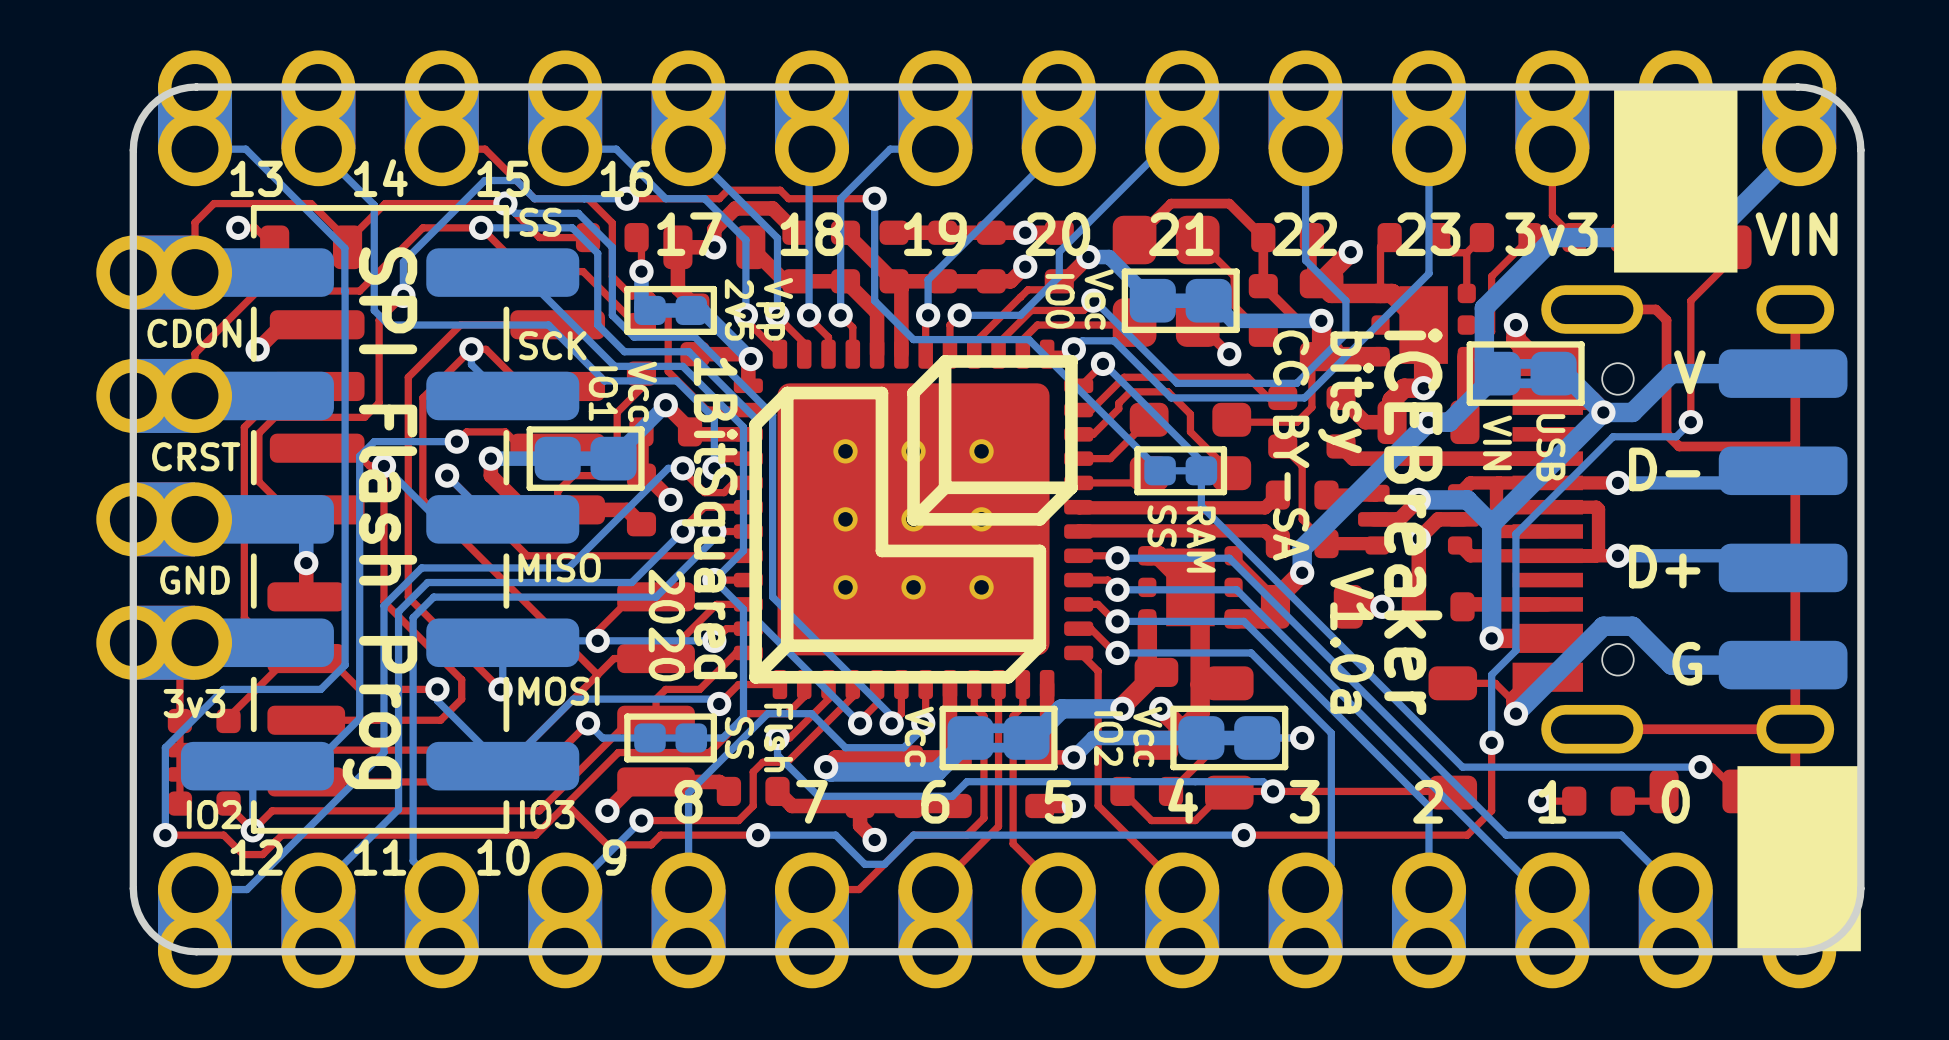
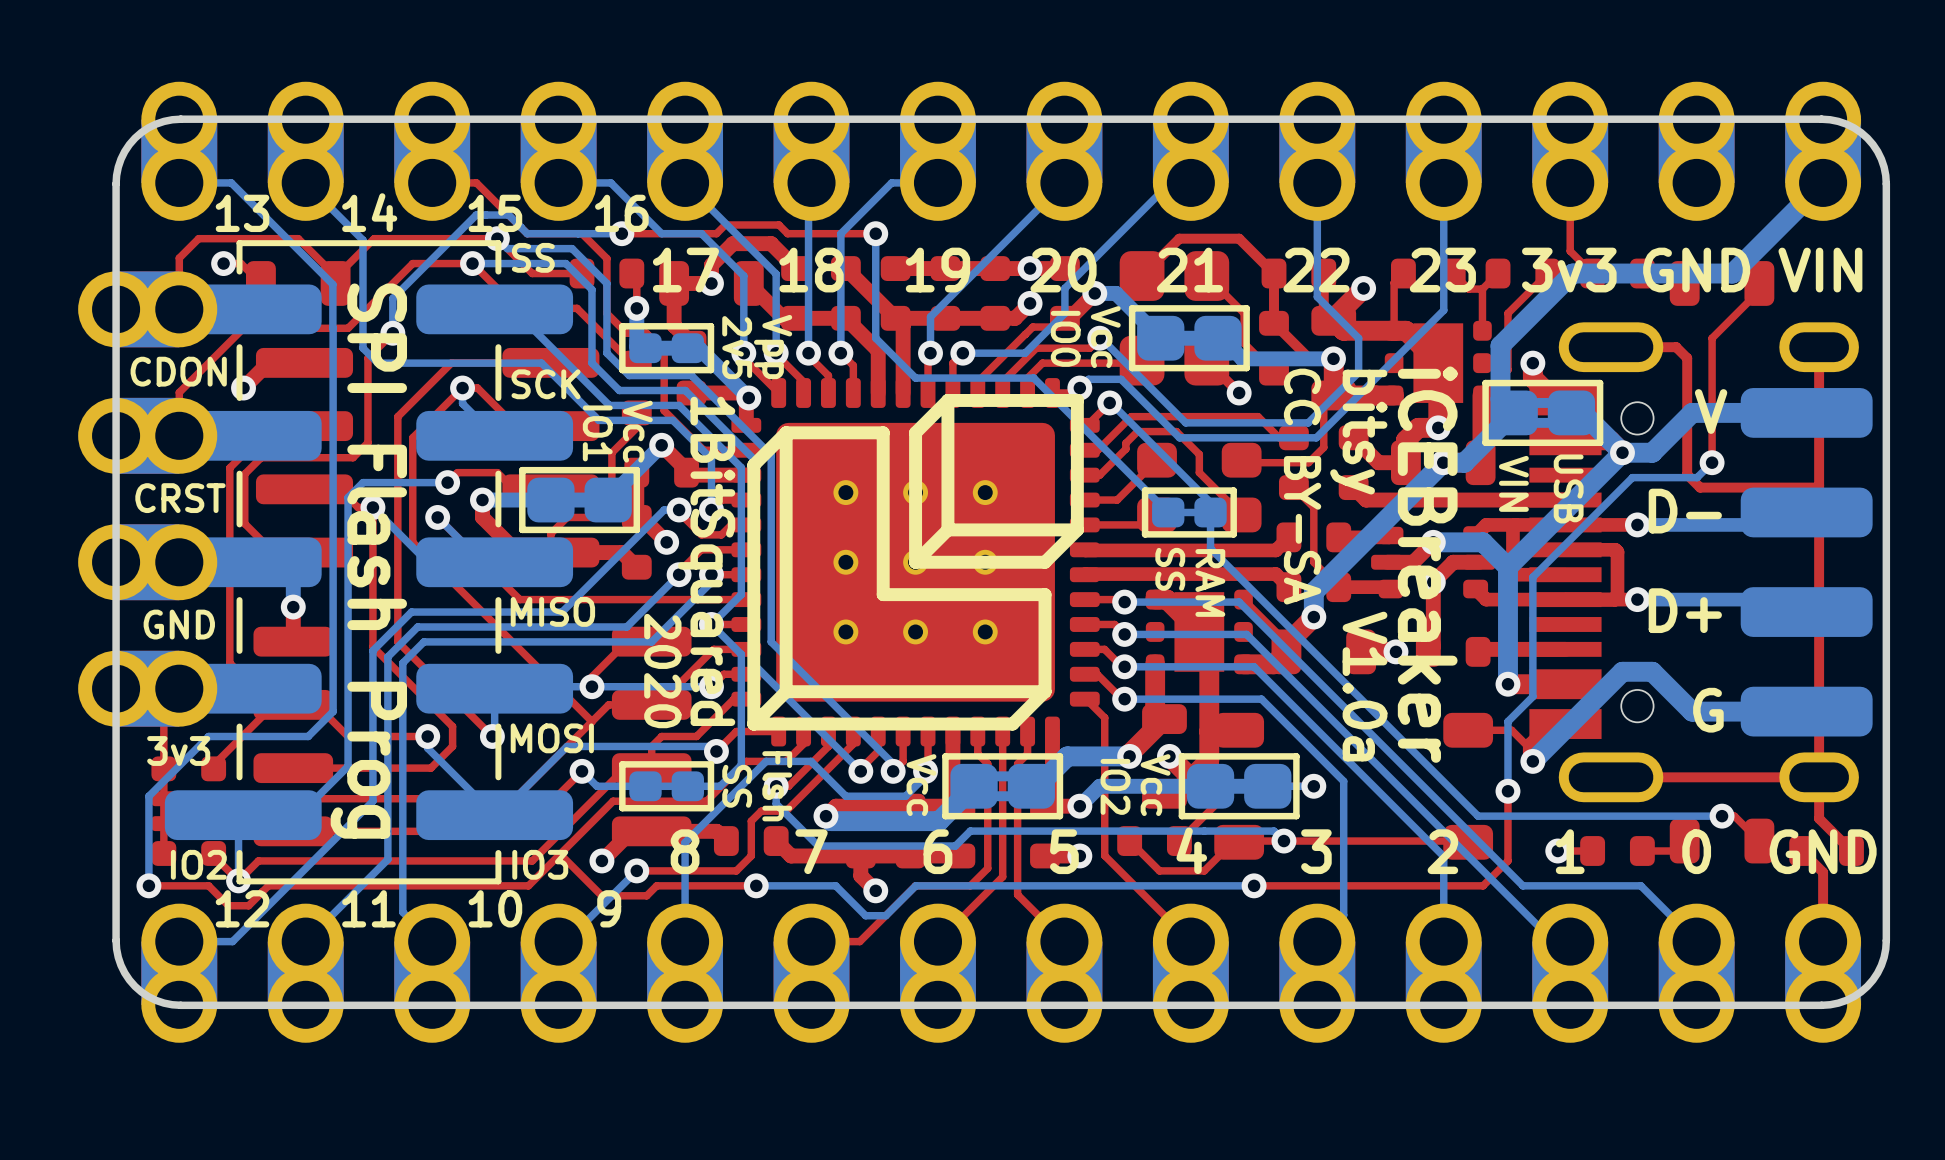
drawing: [1614, 87, 1738, 273] -> none
text: none -> GND (1696, 270)
drawing: [1737, 766, 1861, 952] -> none
text: none -> GND (1823, 851)

